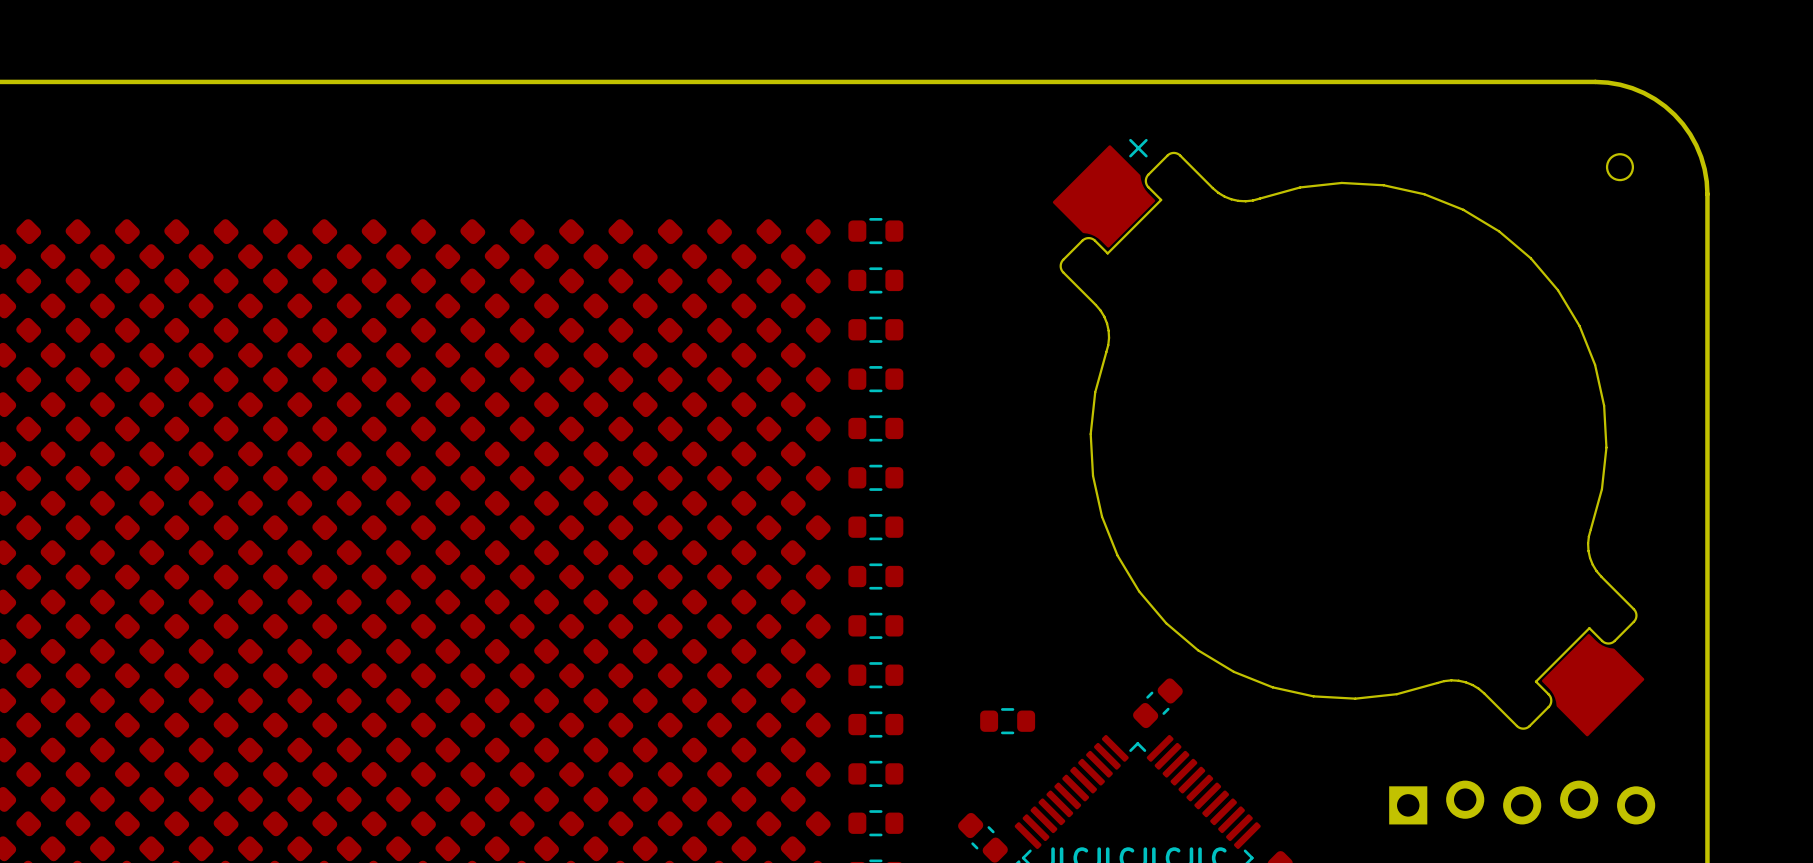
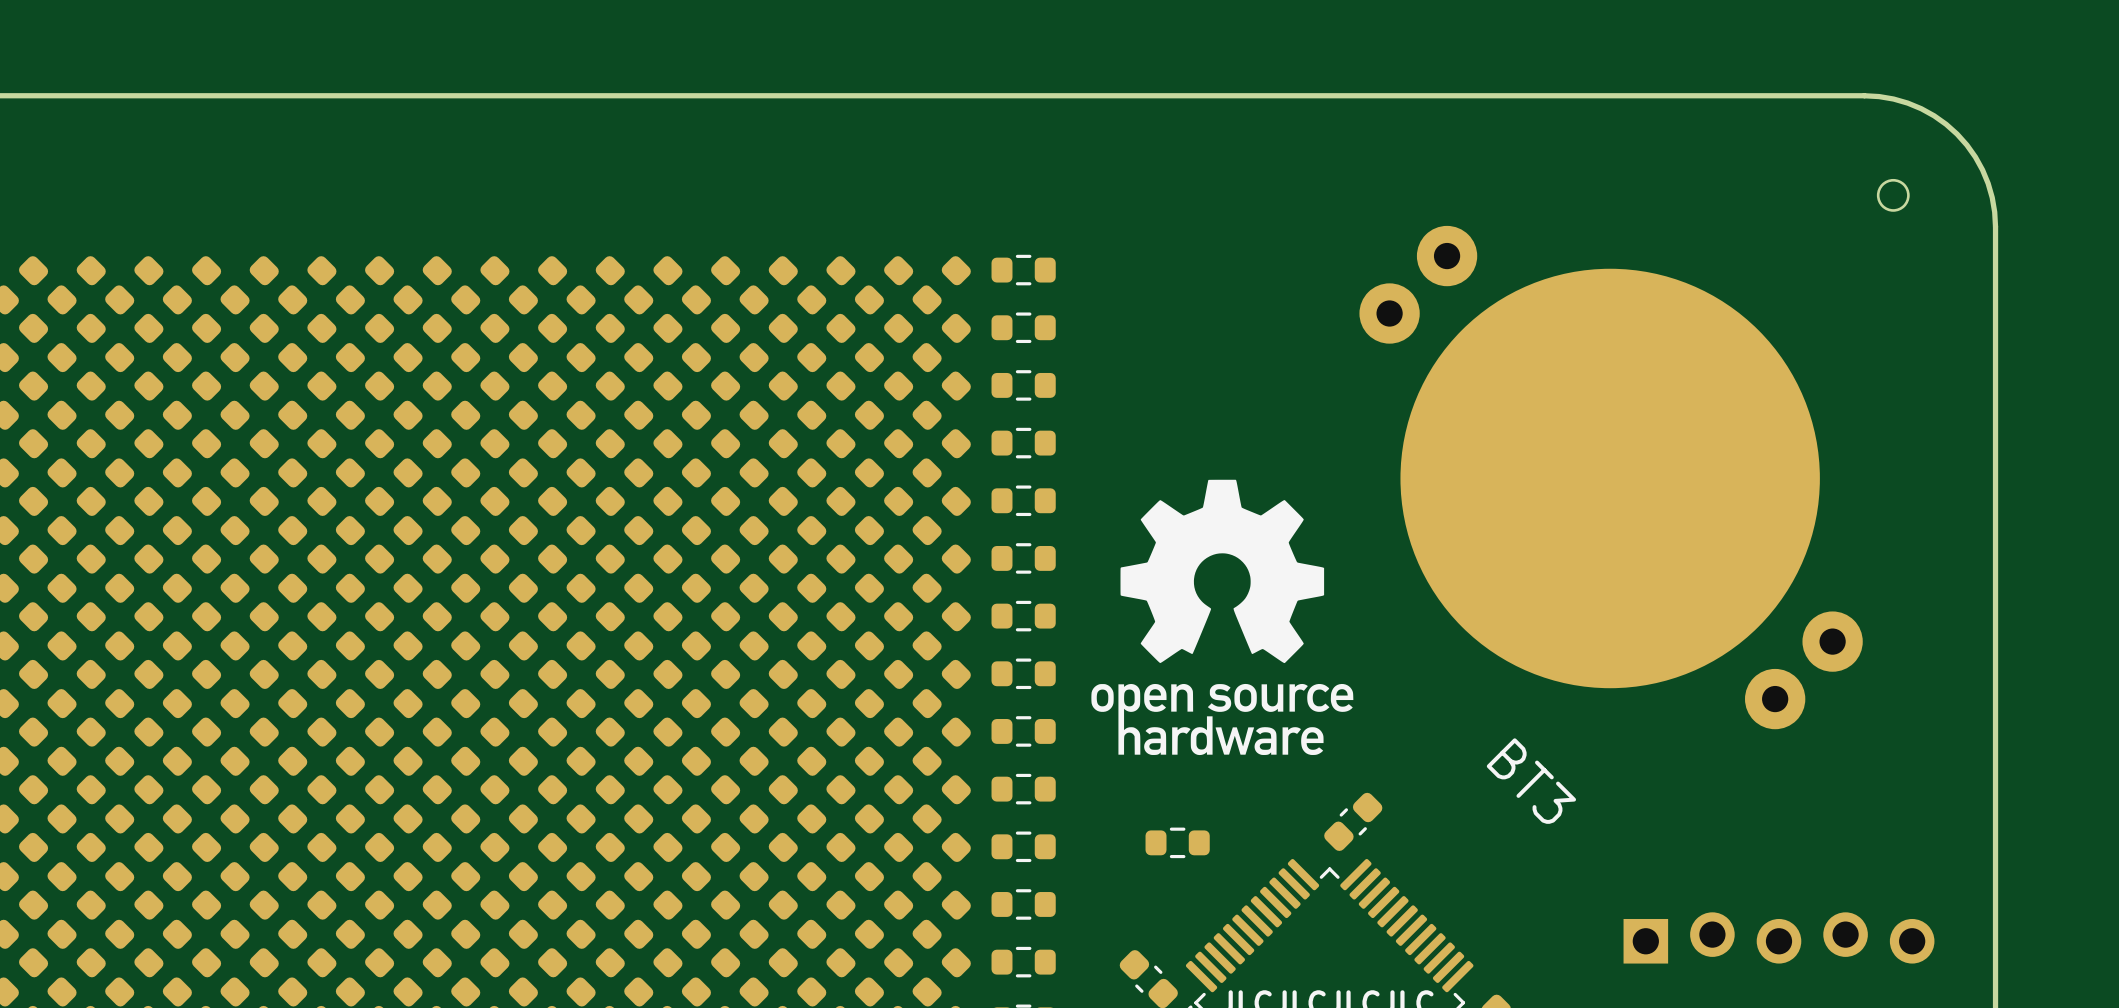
BT3: none -> (1611, 477)
drawing: none -> [1091, 479, 1354, 756]
part: (1348, 437) -> none

